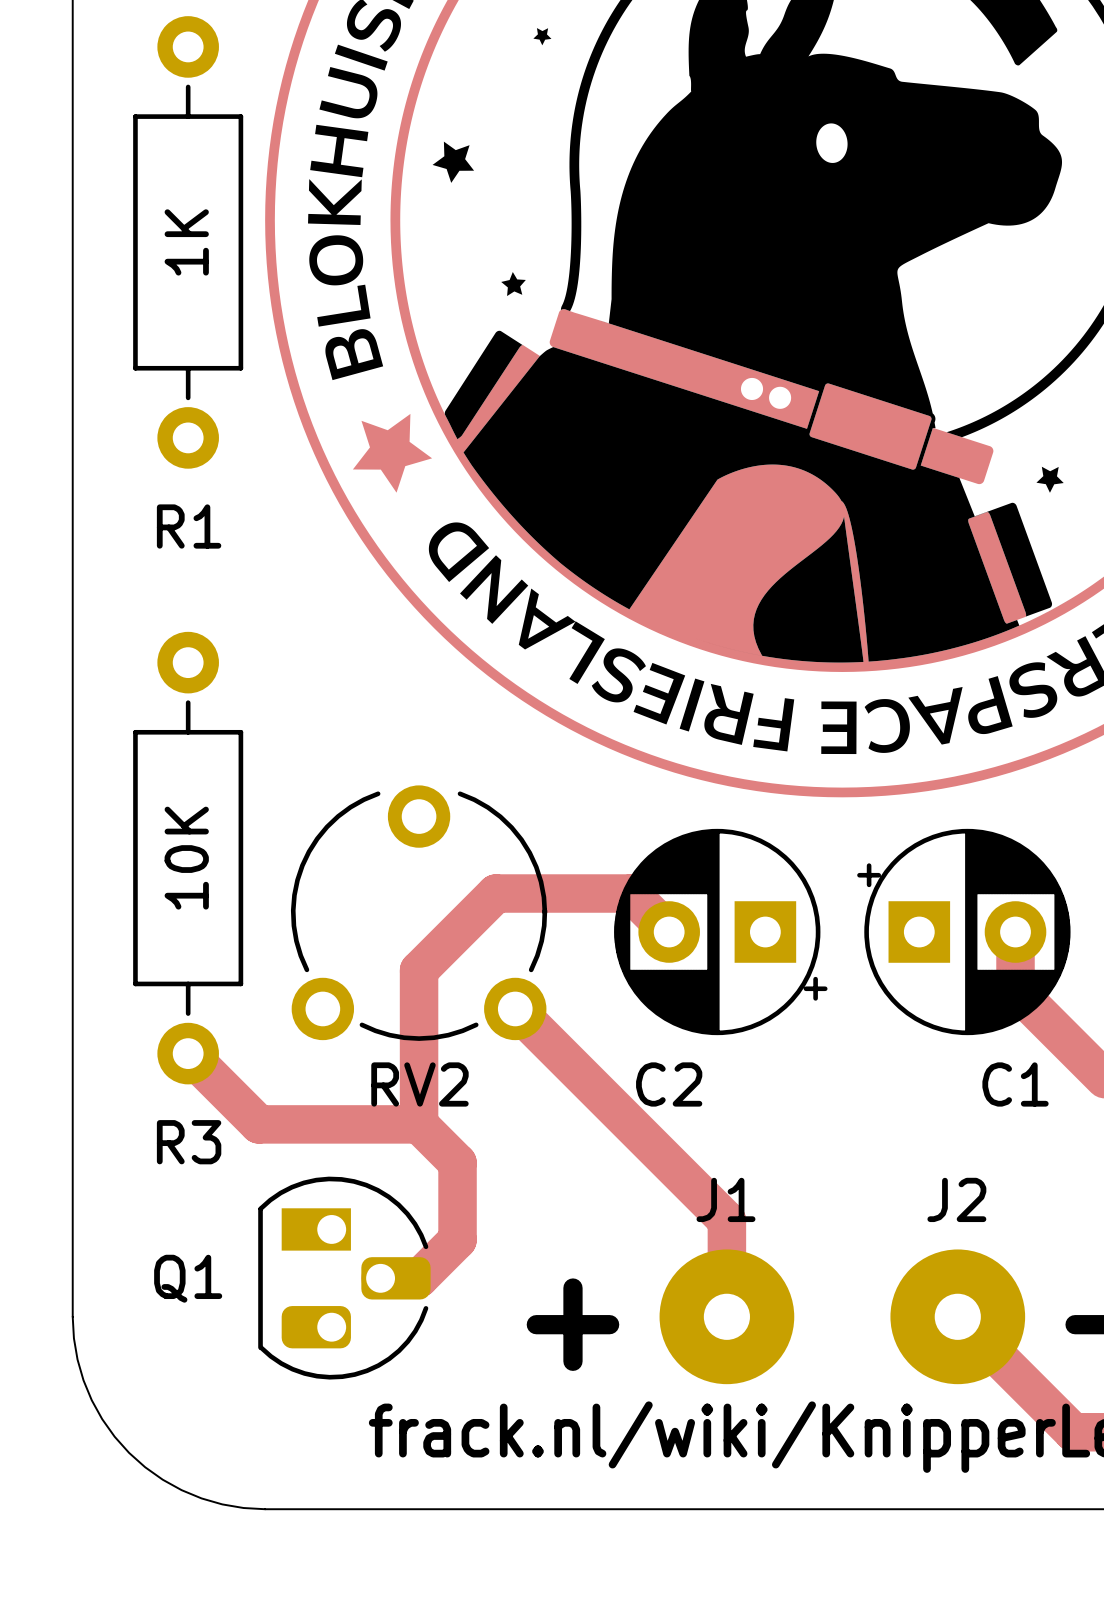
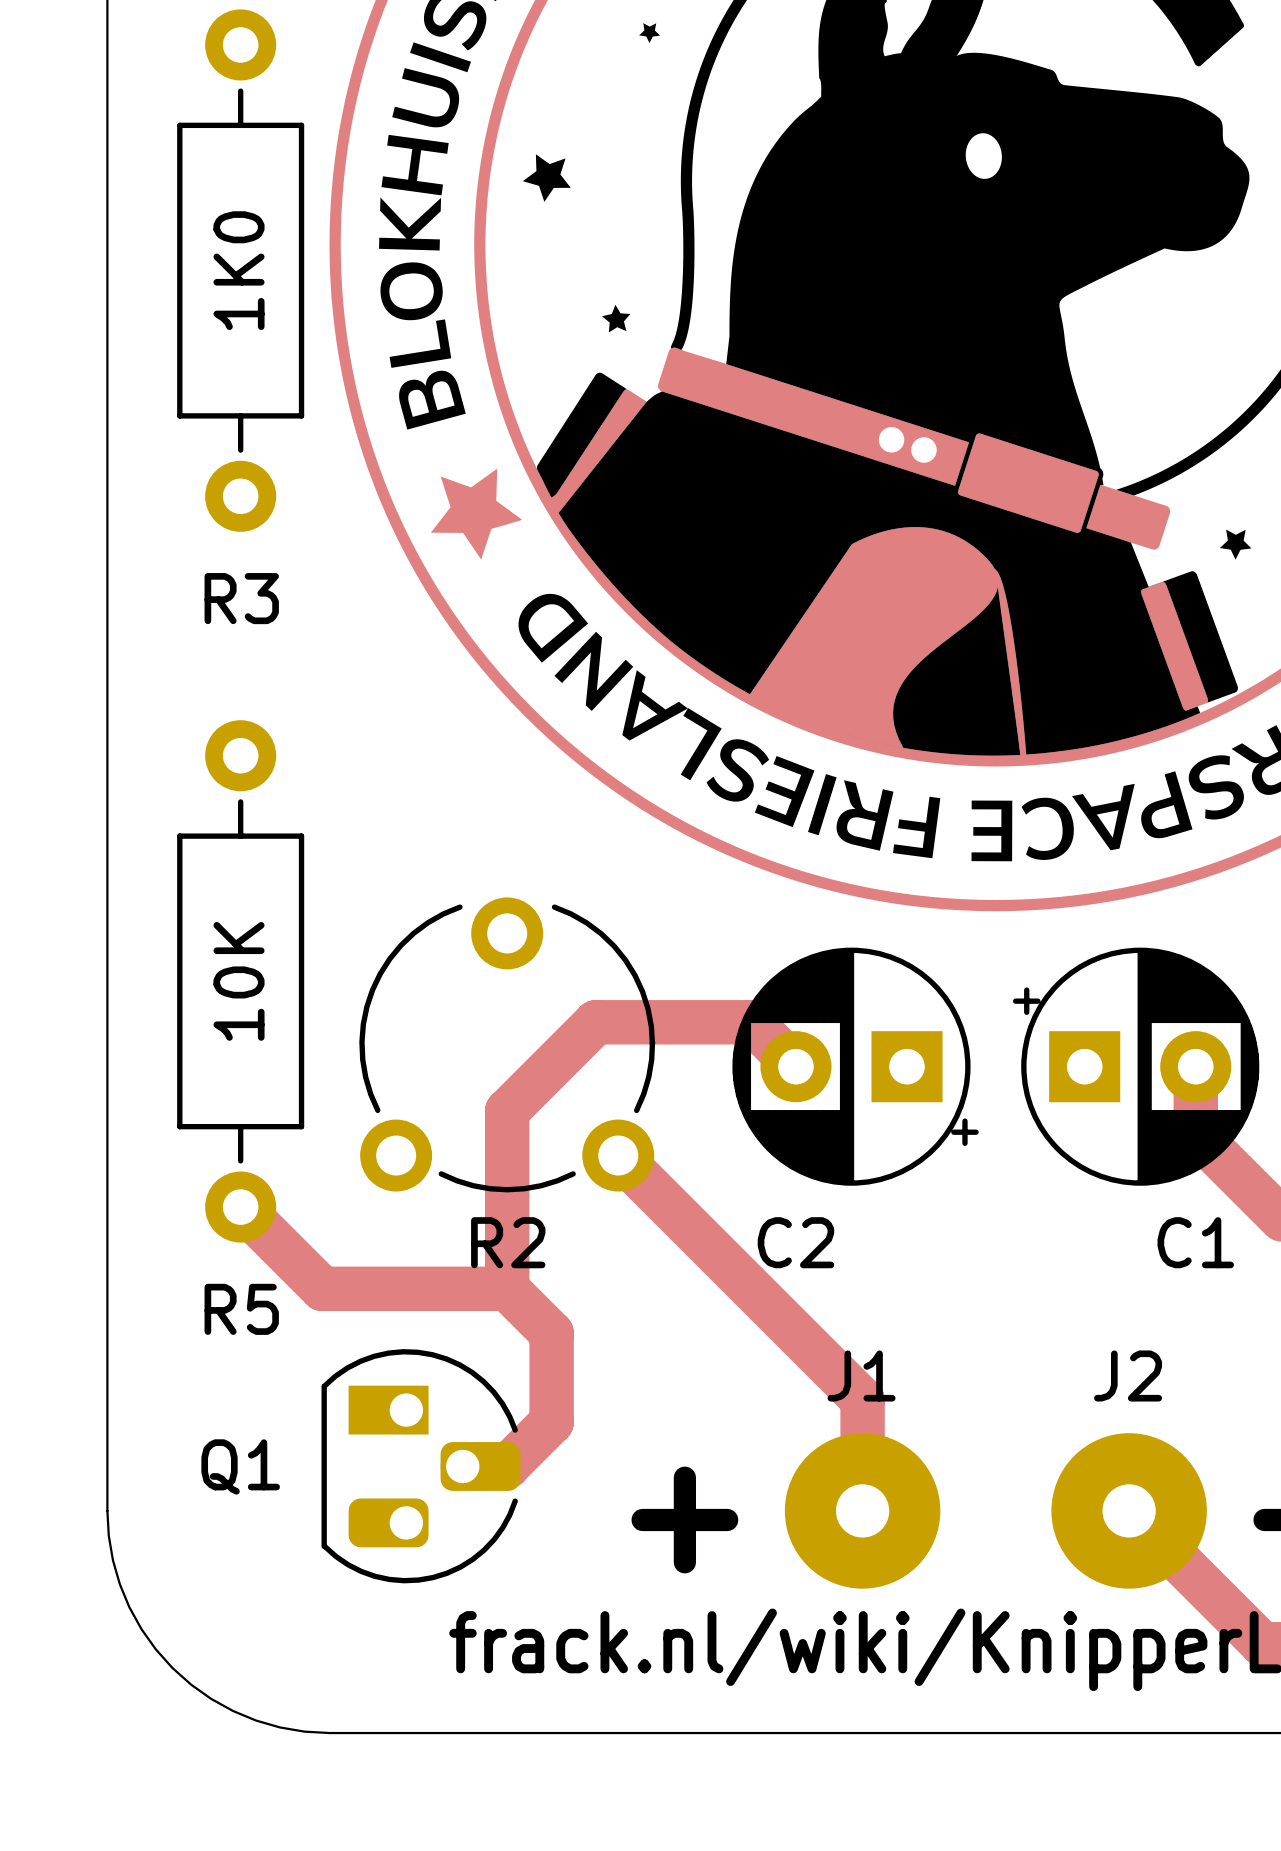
R1 value: 1K (186, 242) -> 1K0 (239, 270)
R1 name: R1 (189, 526) -> R3 (241, 598)
RV2 name: RV2 (419, 1084) -> R2 (508, 1242)
R3 name: R3 (189, 1142) -> R5 (241, 1309)

